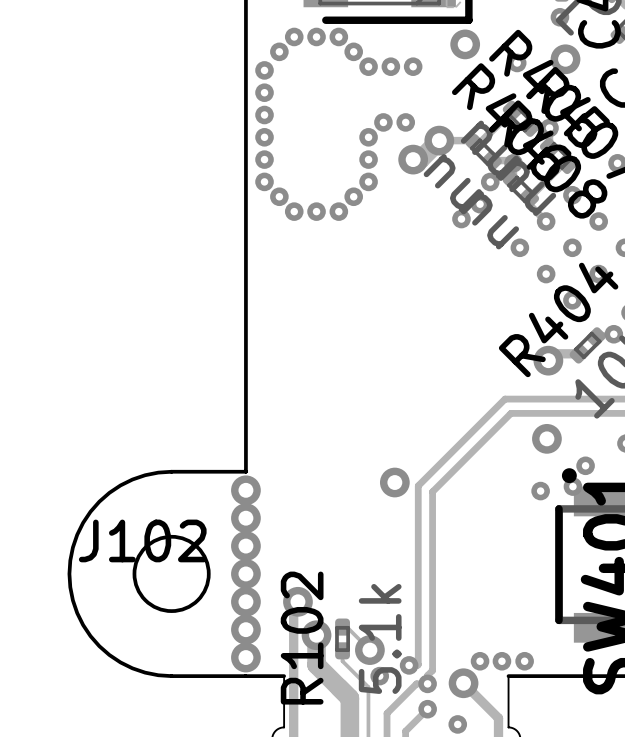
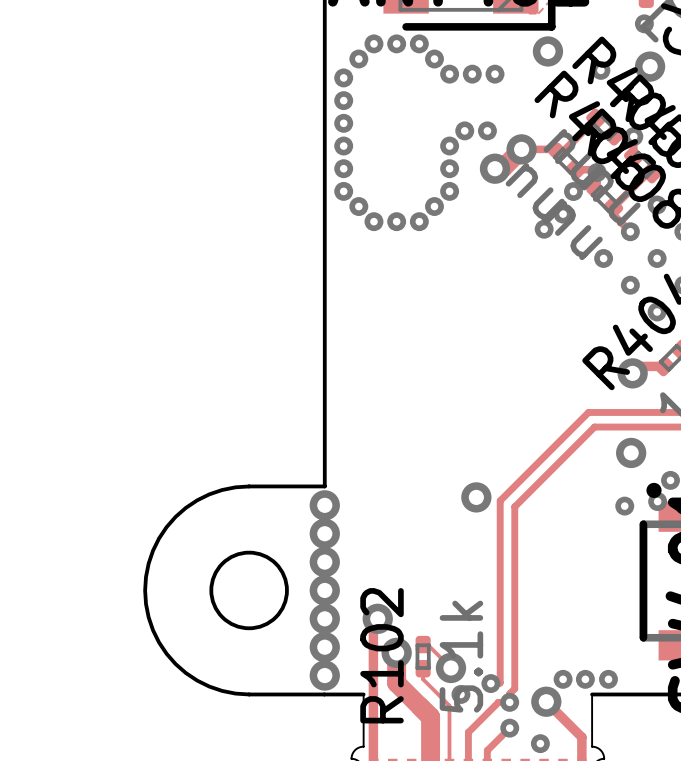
J102 name: J102 (142, 540) -> none

